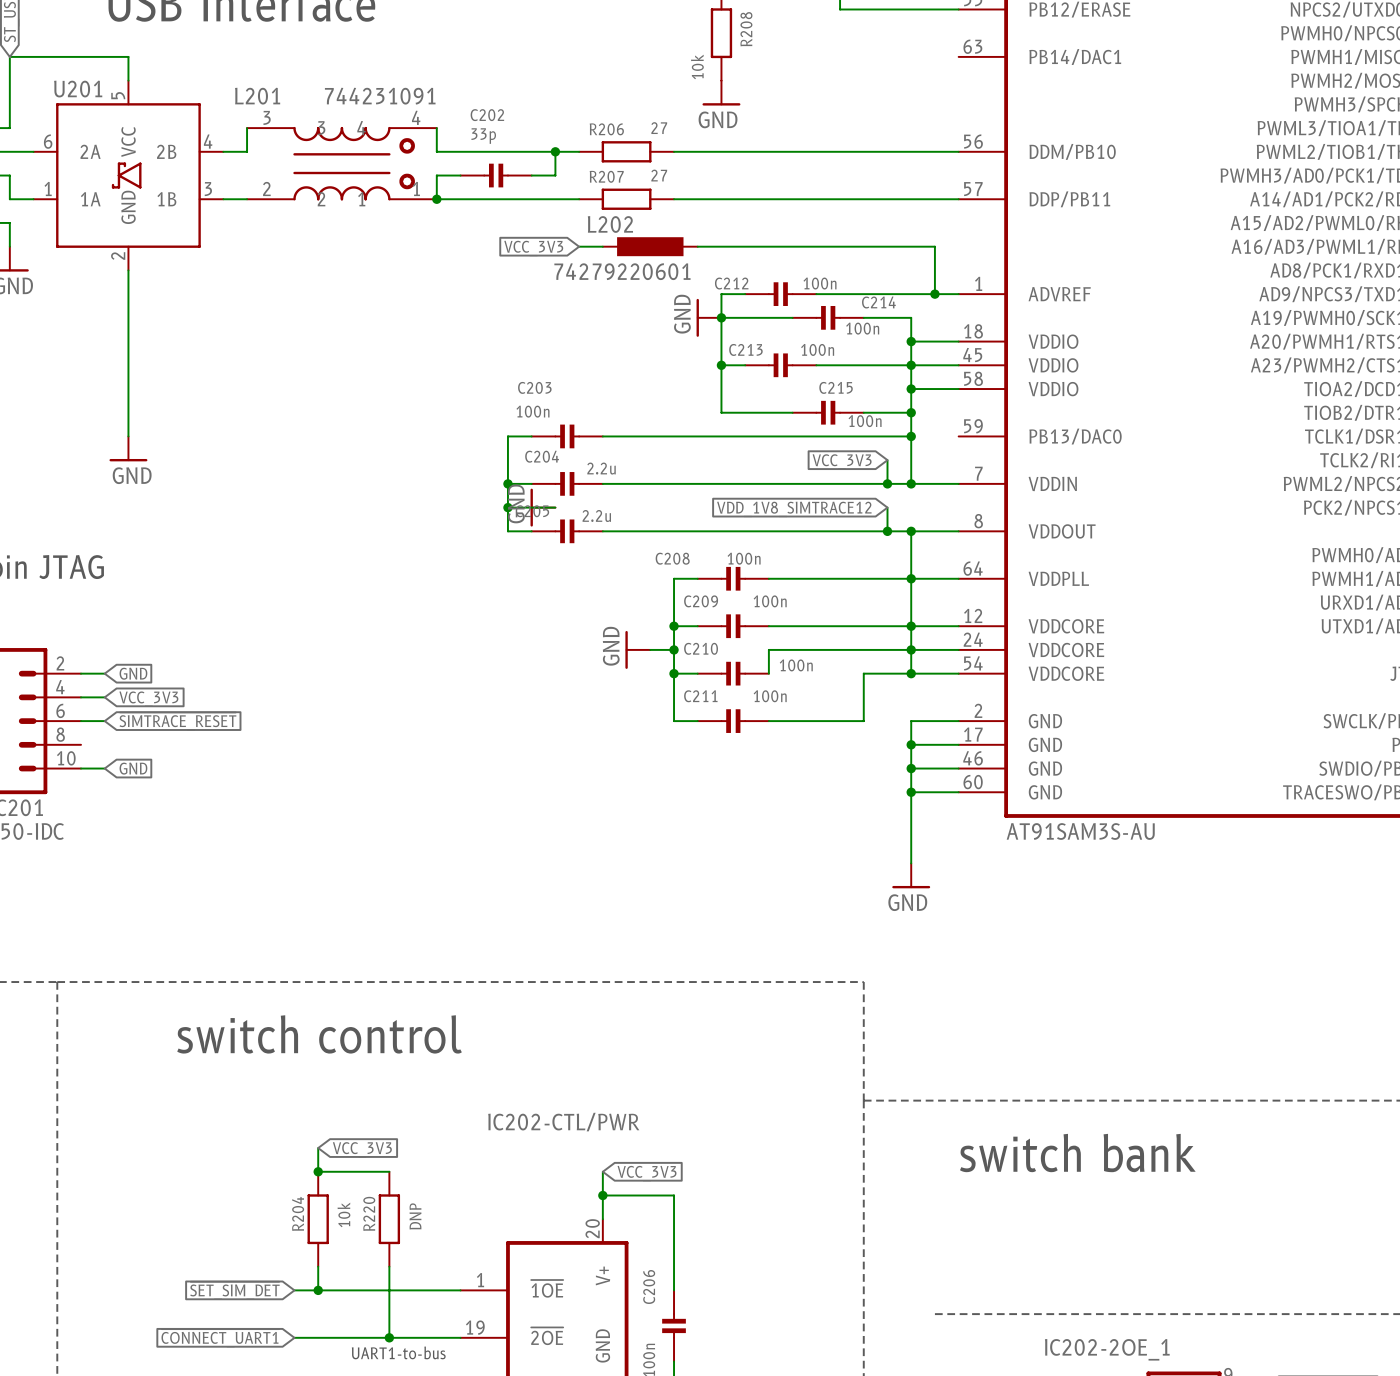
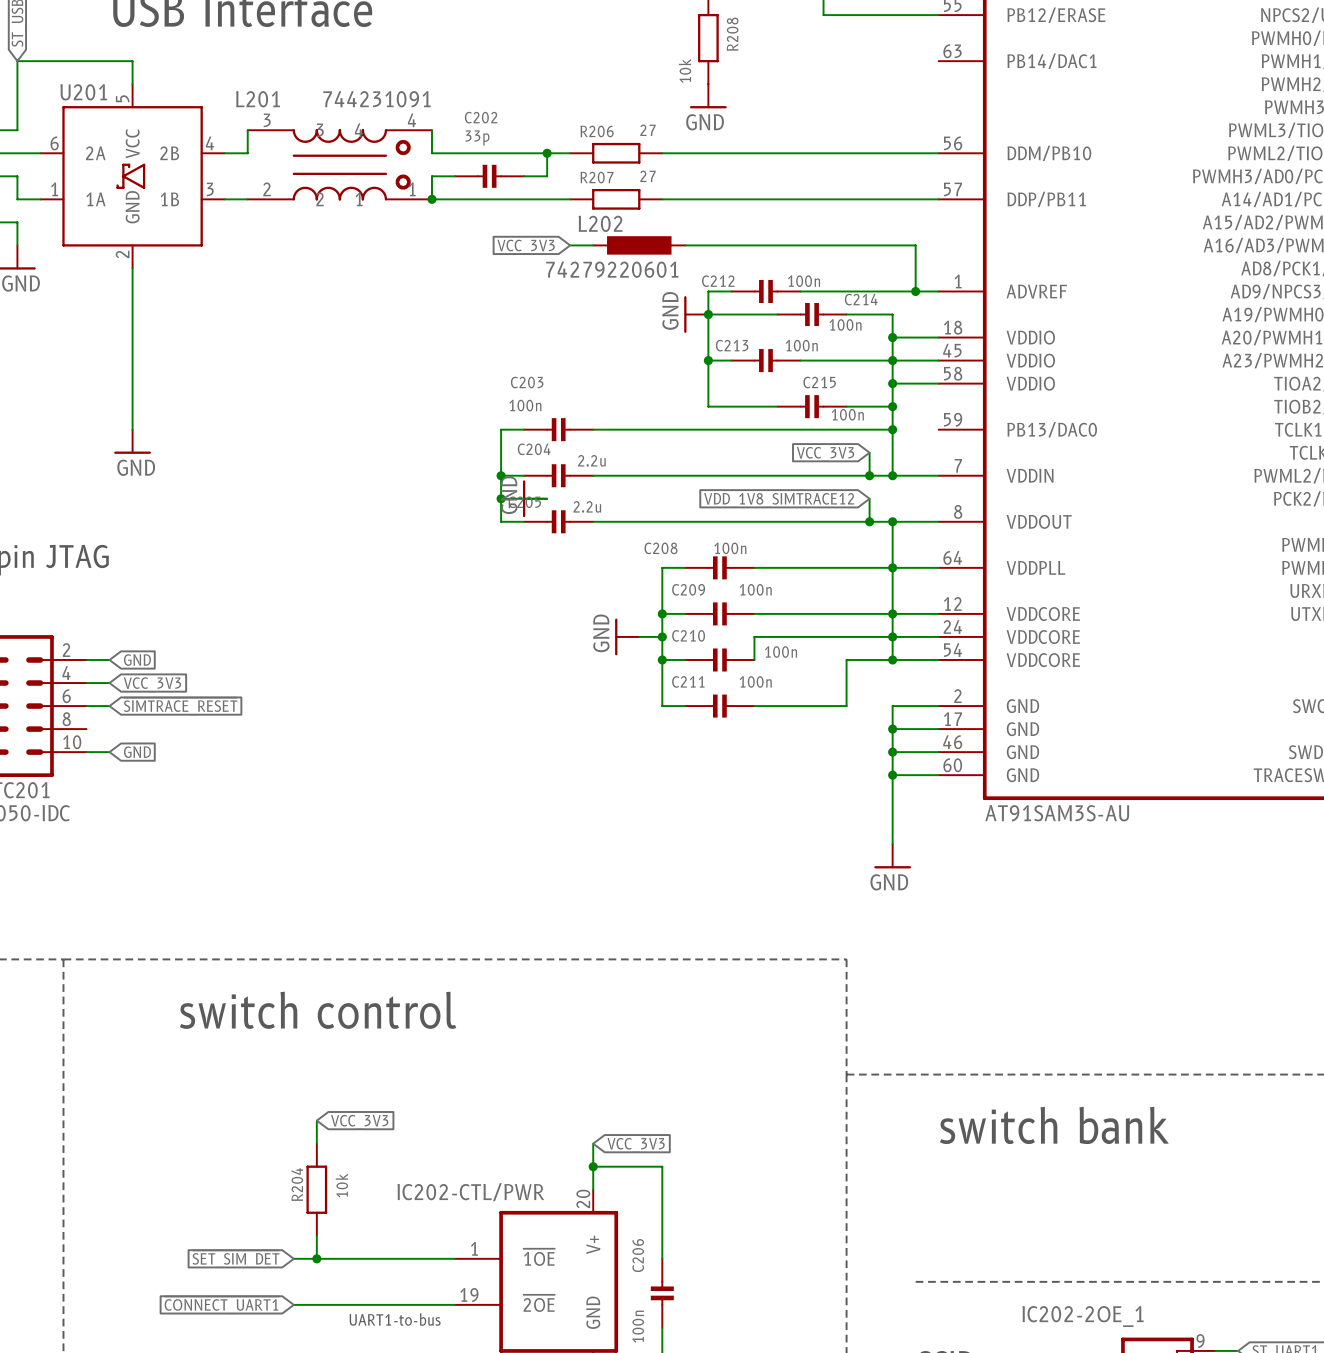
IC202-CTL/PWR name position: IC202-CTL/PWR (563, 1122) -> IC202-CTL/PWR (470, 1192)
wire: (318, 1171) (389, 1171) -> none
junction: (318, 1171) -> none
R220: DNP (389, 1219) -> none
wire: (389, 1266) (389, 1337) -> none
junction: (389, 1337) -> none

